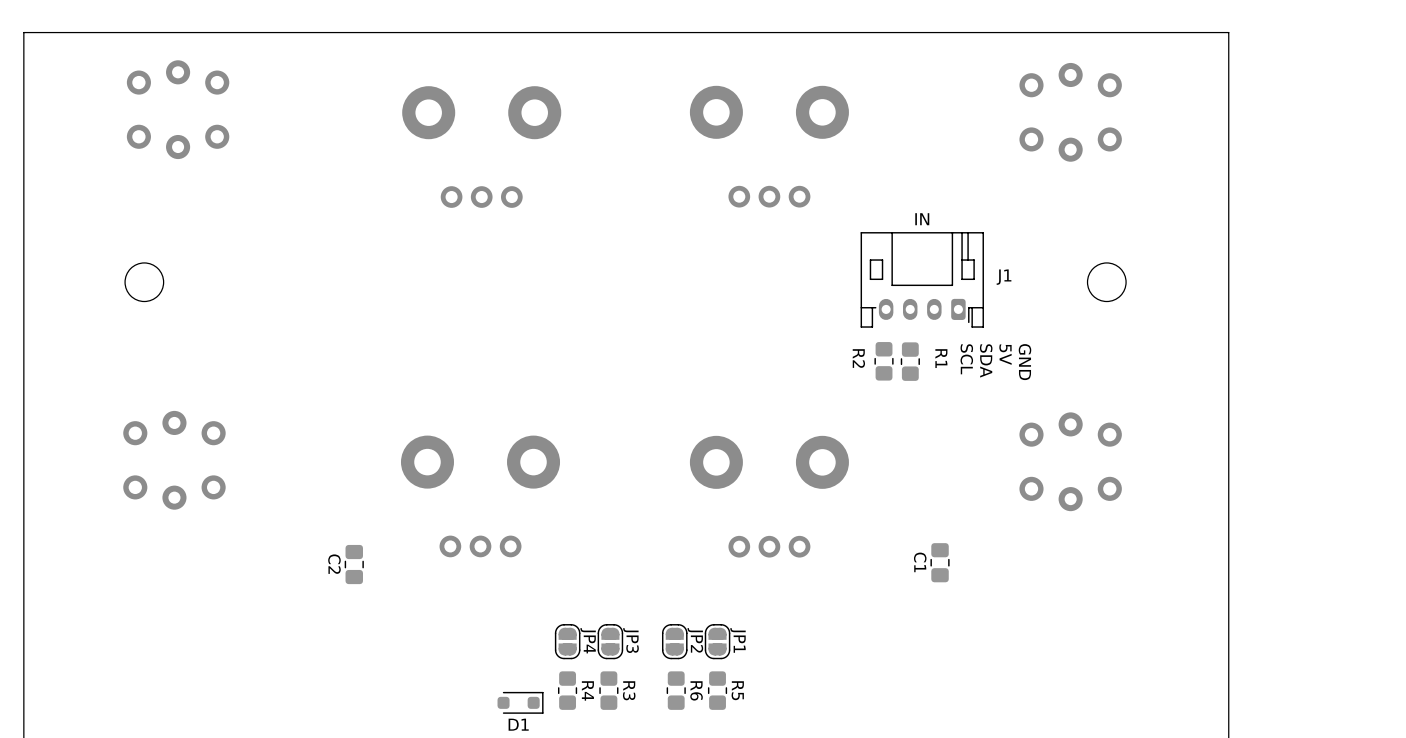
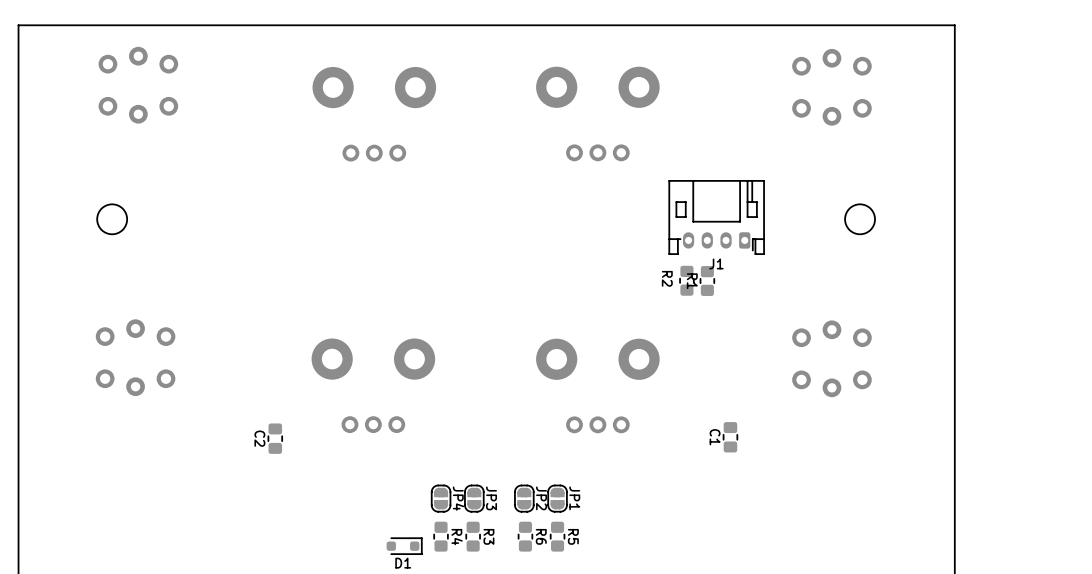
J1 value: IN (922, 219) -> none
J1 name position: J1 (1004, 277) -> J1 (716, 263)
text: 5V (1005, 354) -> none
R1 name position: R1 (941, 358) -> R1 (692, 281)
text: SCL (966, 359) -> none
text: SDA (986, 360) -> none
text: GND (1024, 362) -> none

